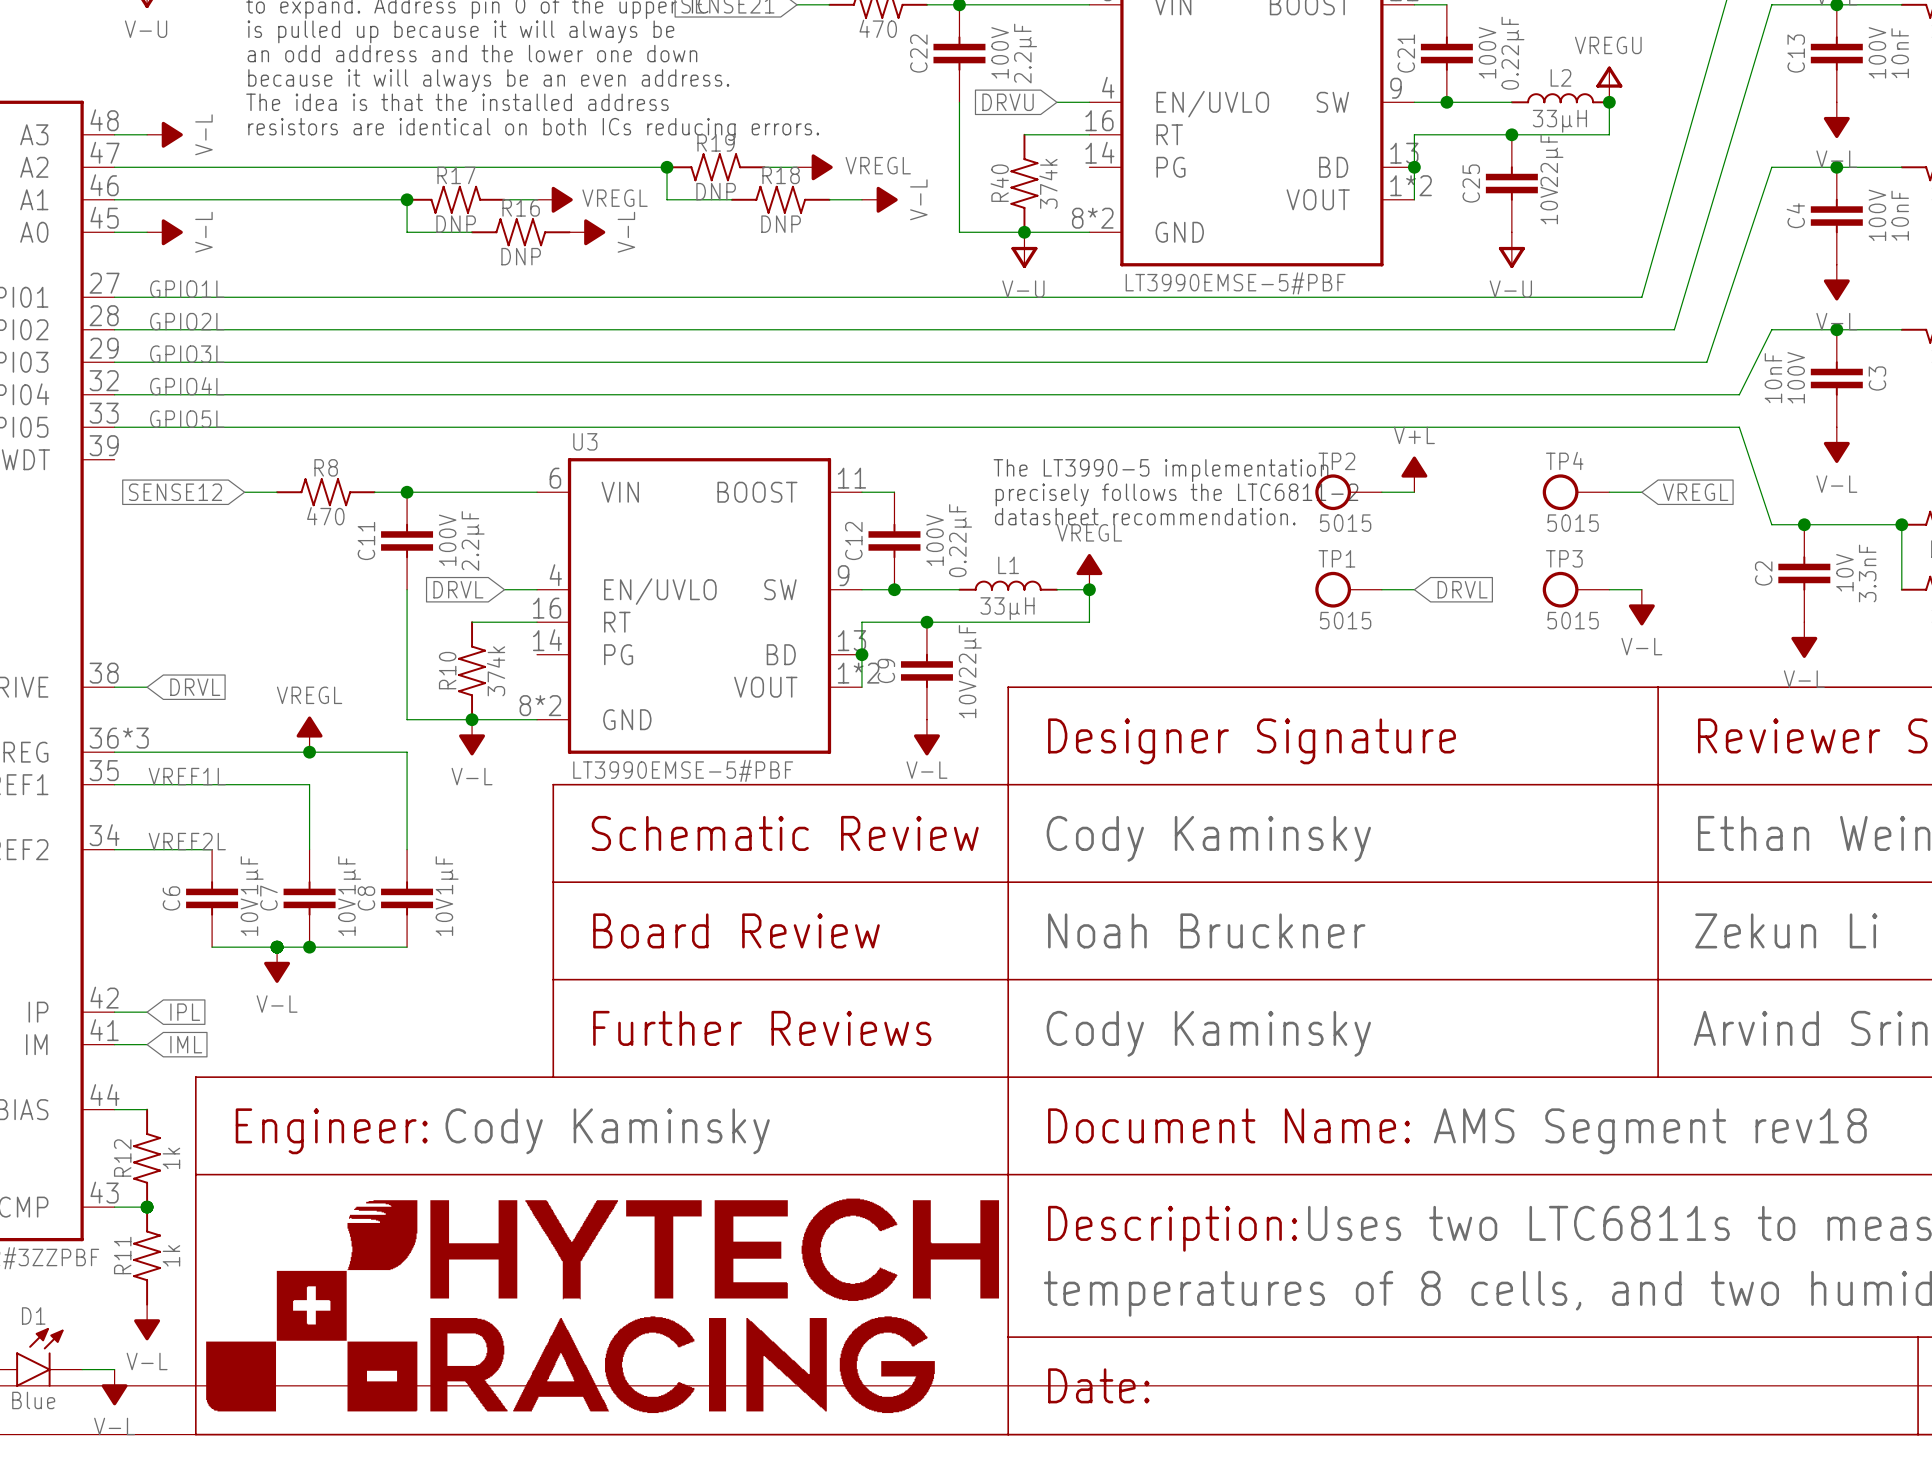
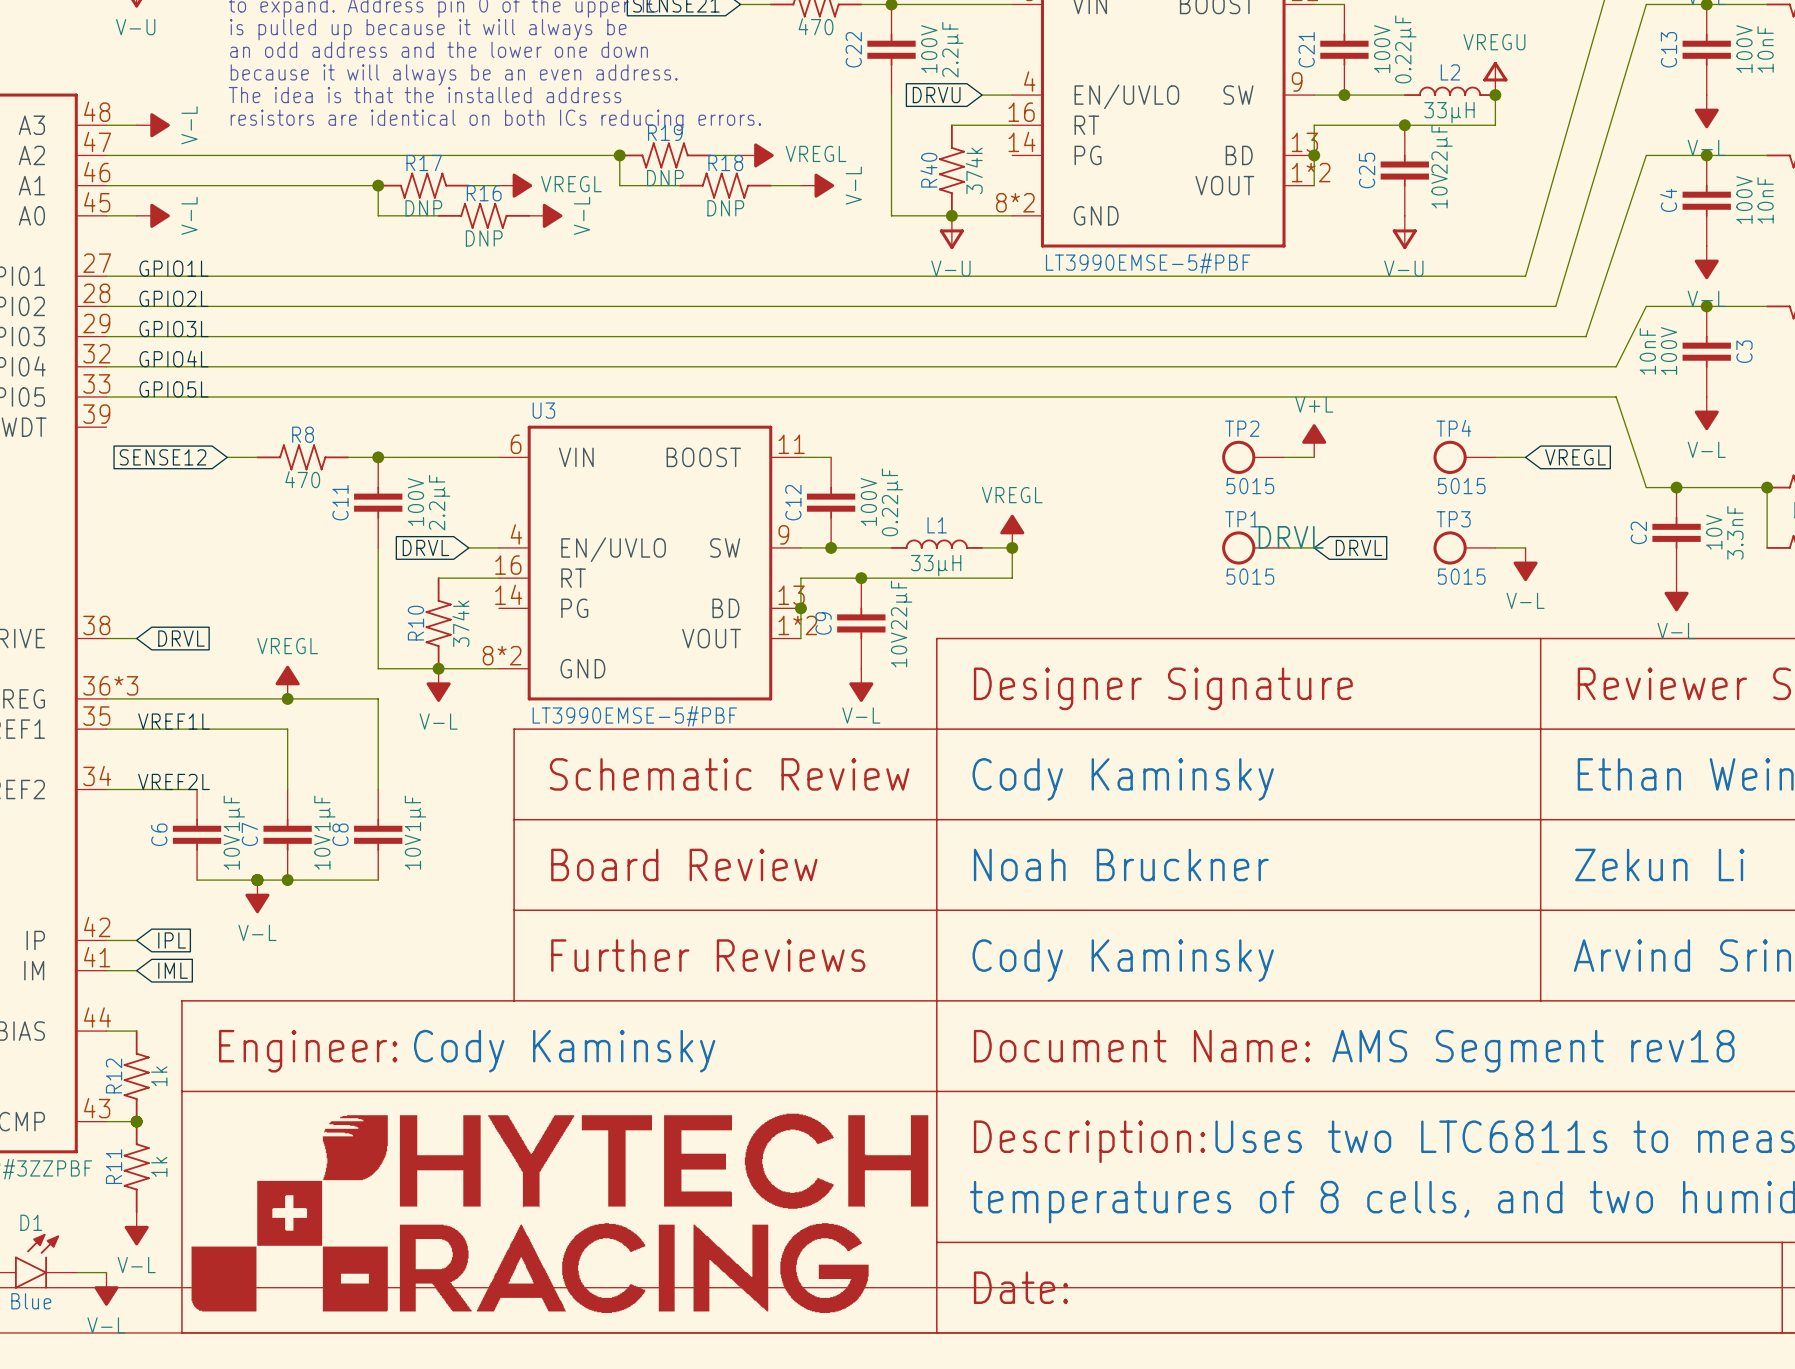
text: The LT3990-5 implementation (1160, 470) -> none
text: precisely follows the LTC6811-2 (1176, 494) -> none
text: datasheet recommendation. (1145, 516) -> none
TP1 text: none -> DRVL (1291, 537)

